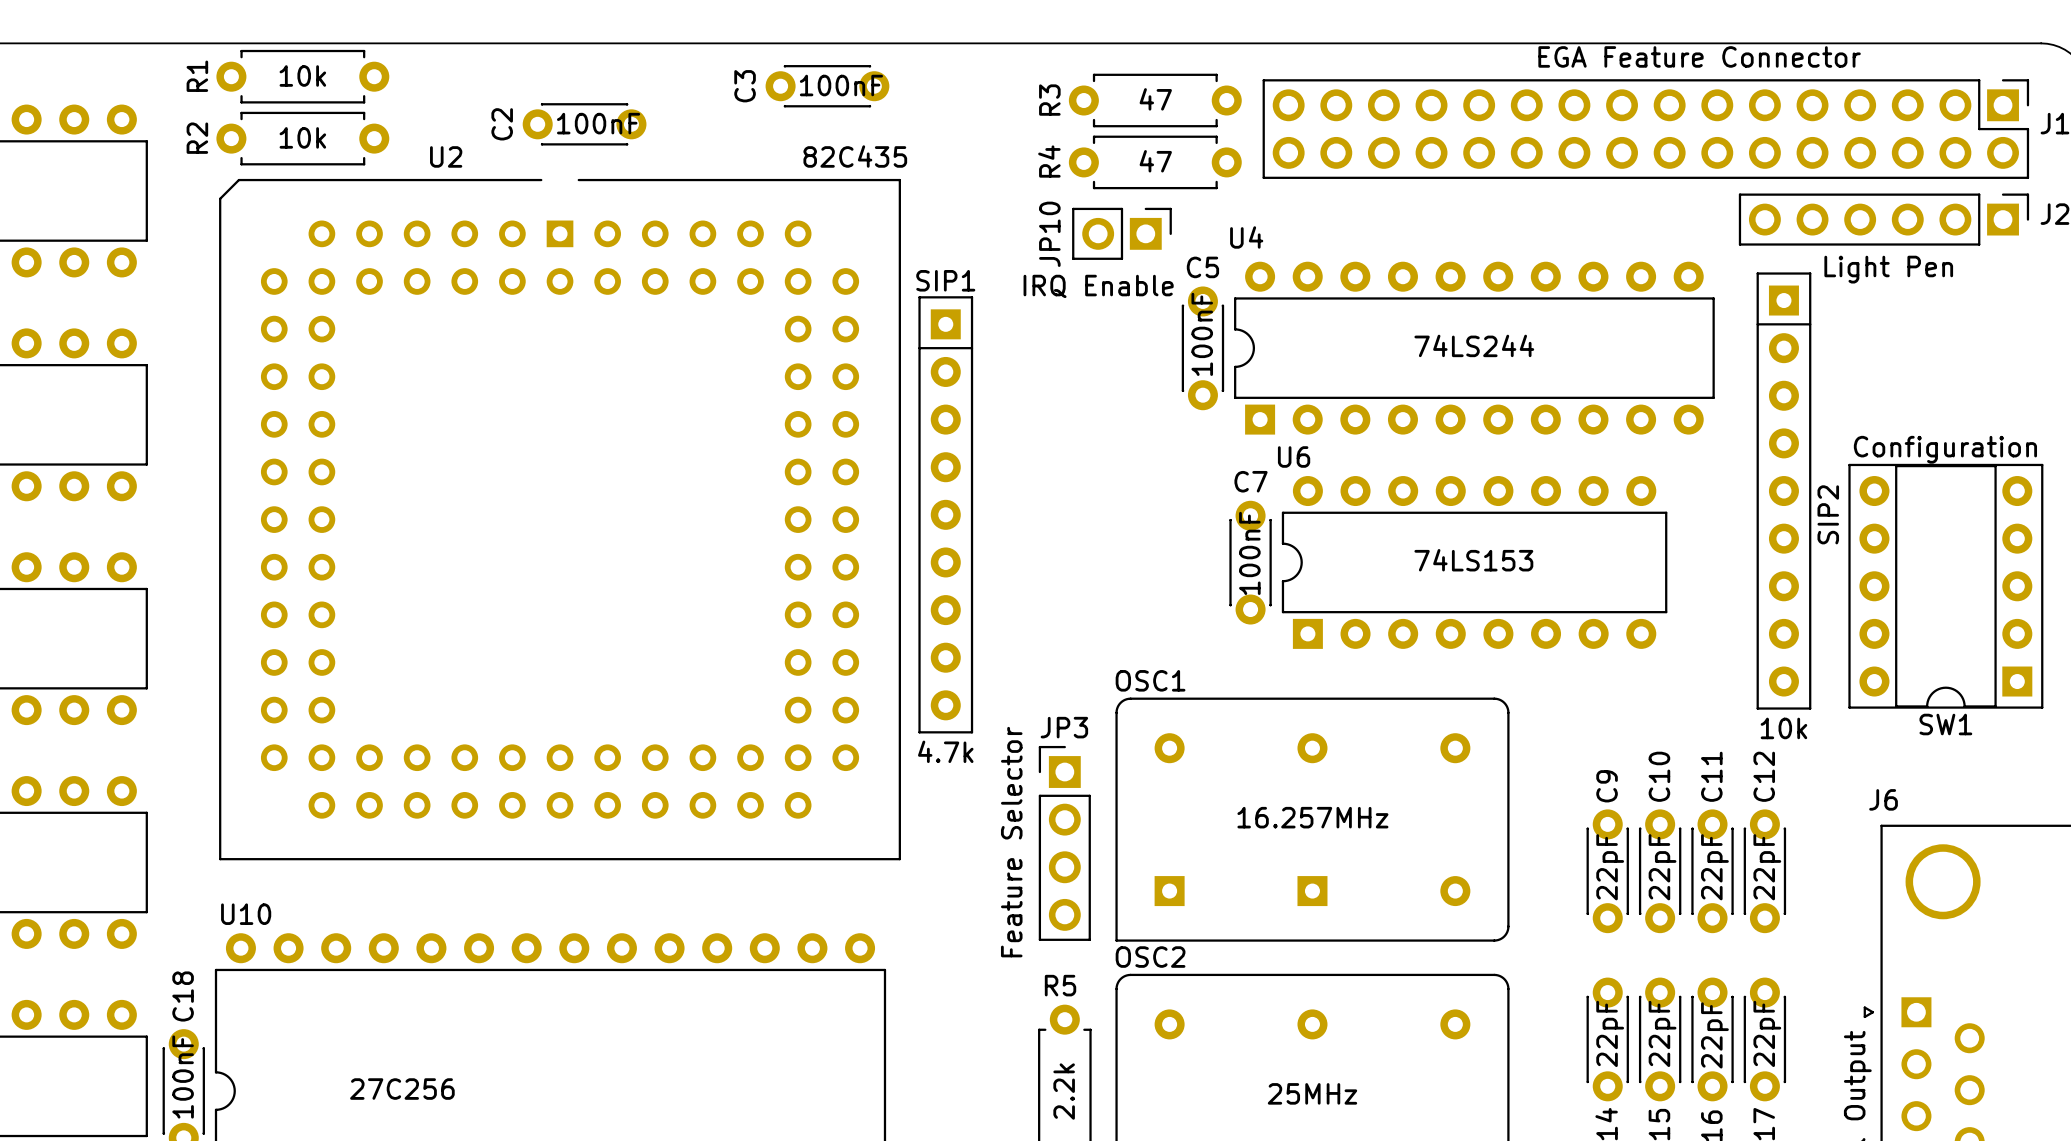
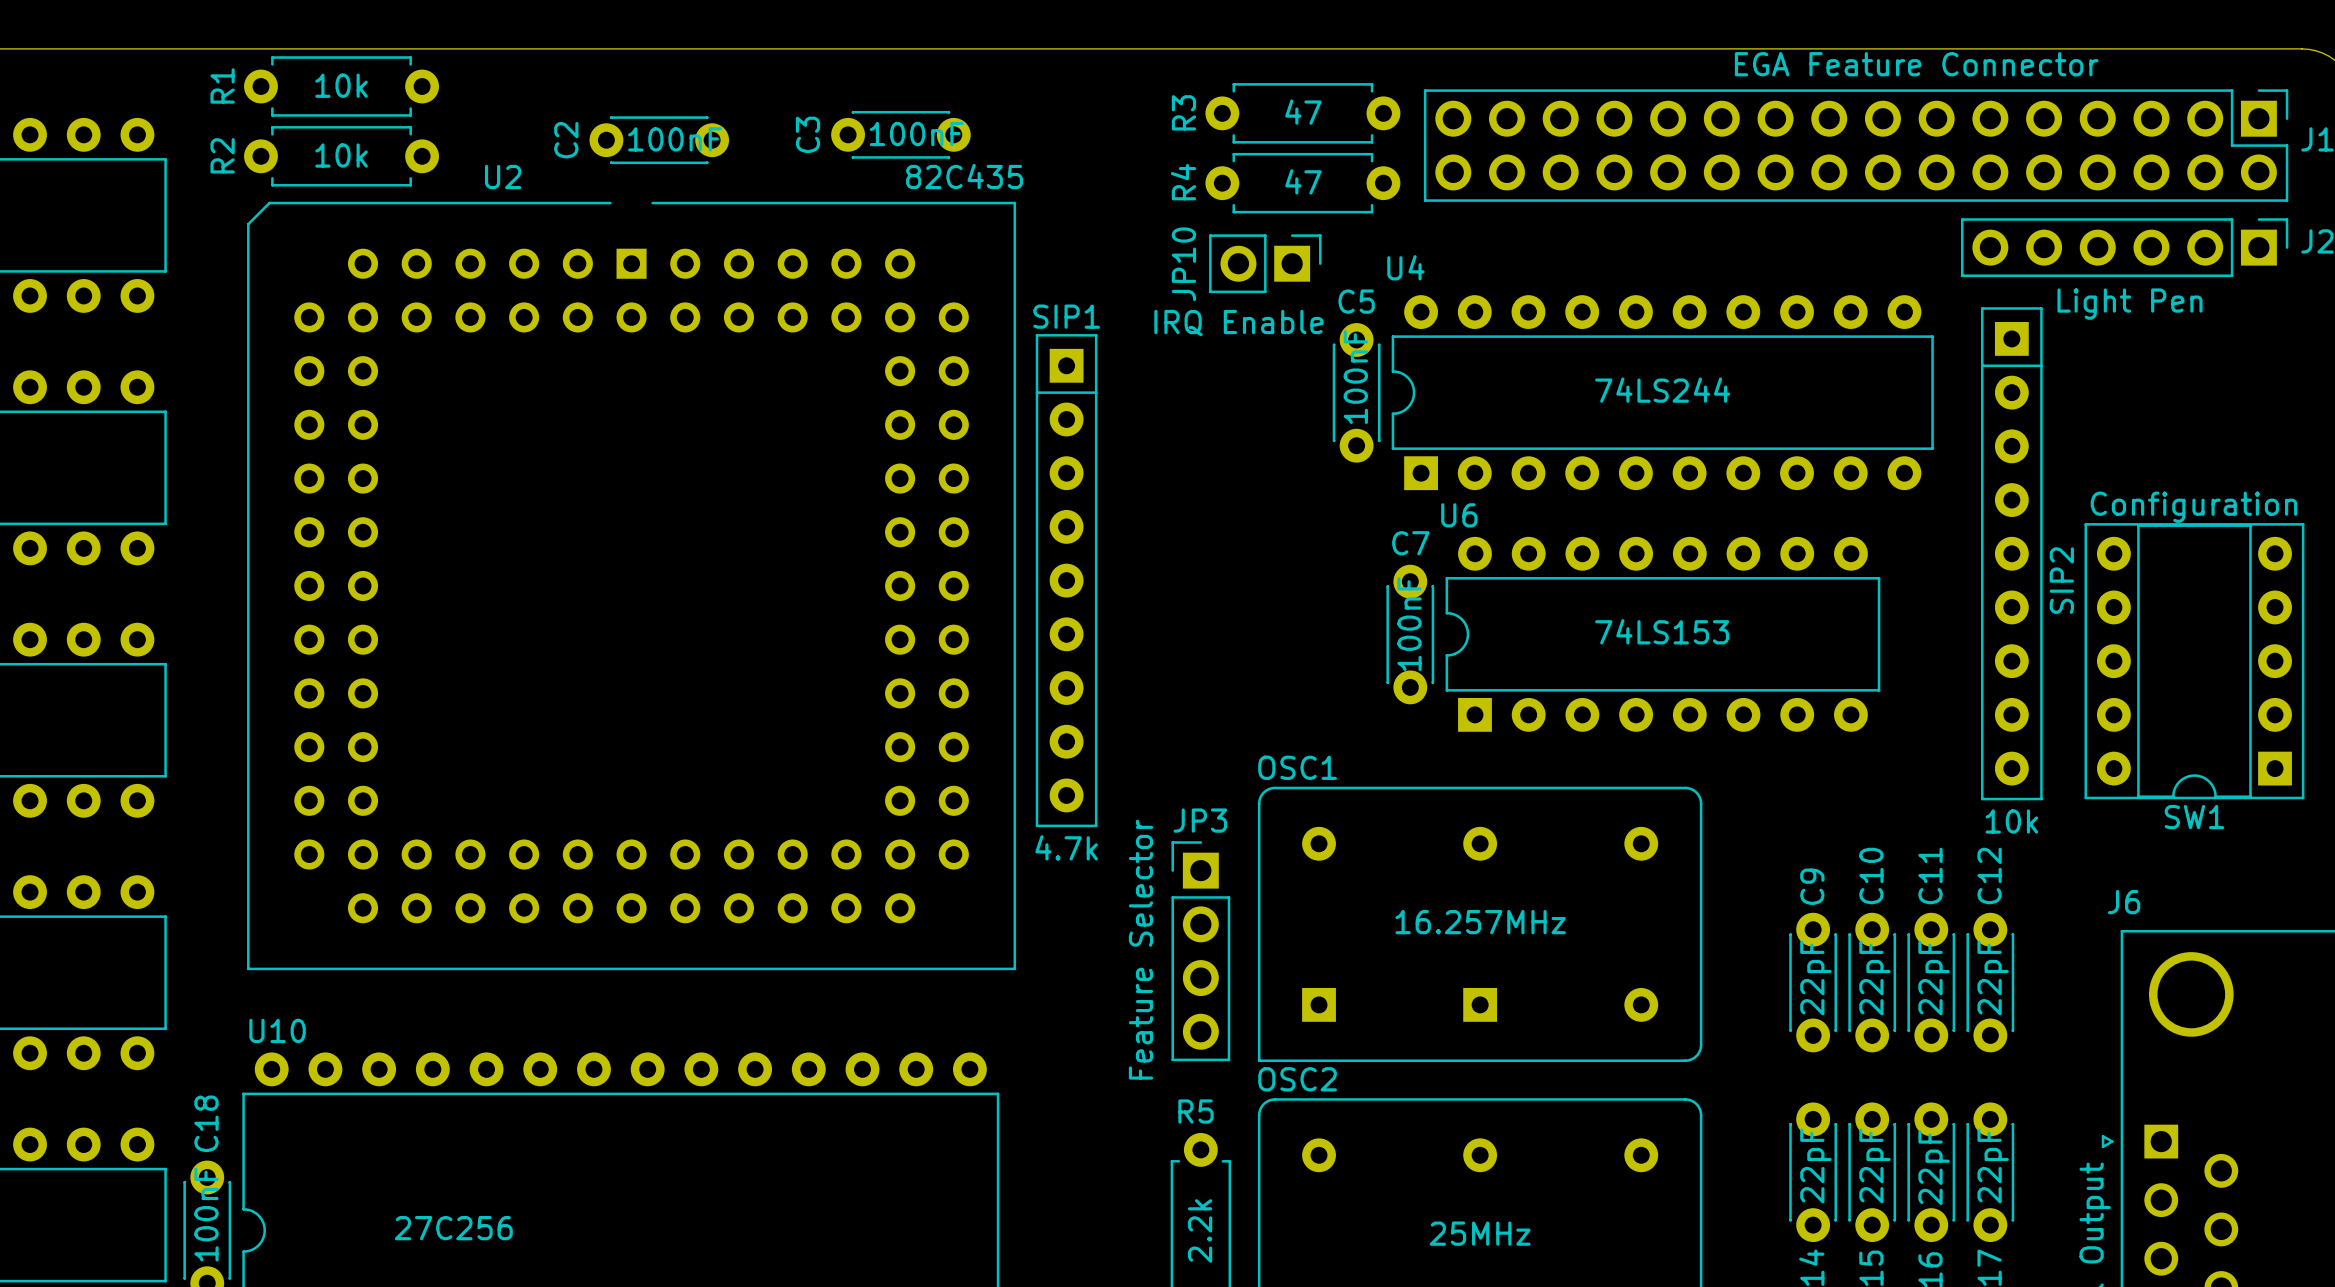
C3 position: (827, 86) -> (900, 134)

